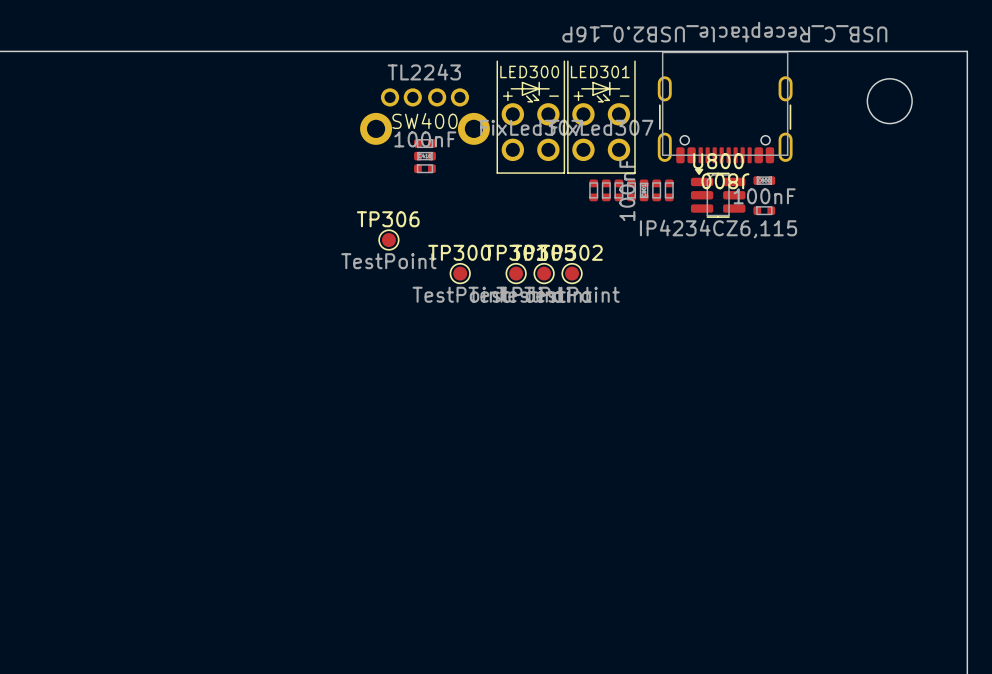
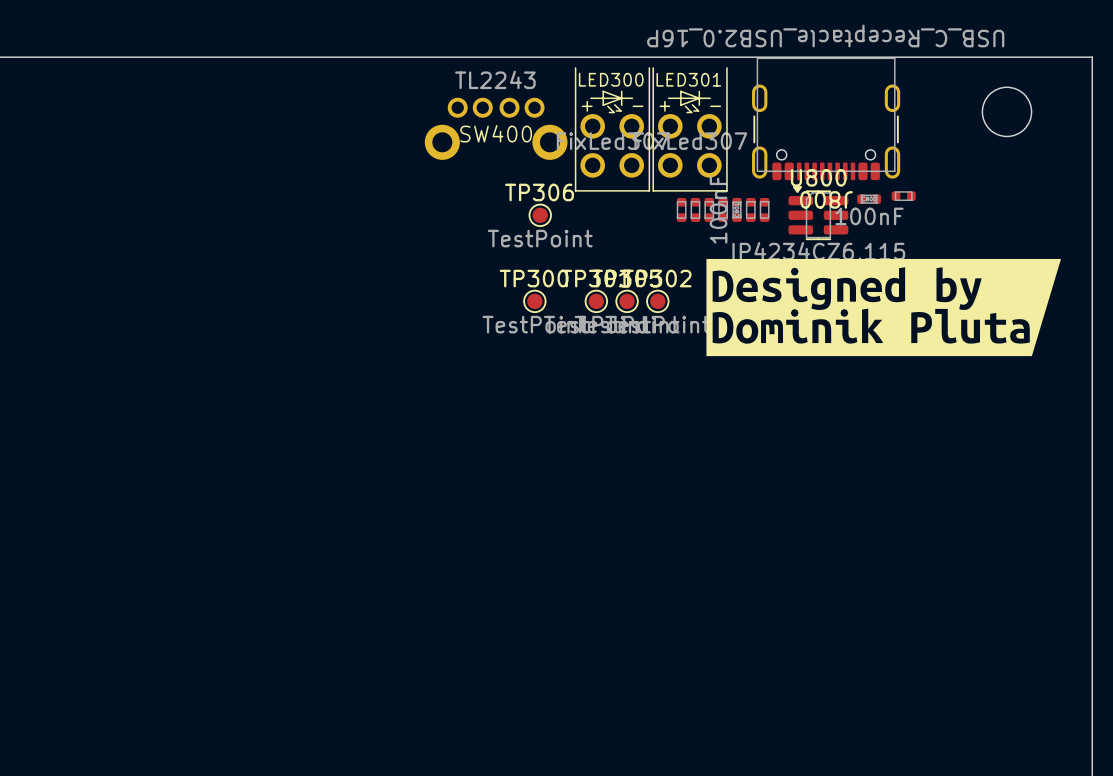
part: (424, 143) -> none
part: 100nF (424, 156) -> none
part: (424, 168) -> none
part position: (764, 210) -> (903, 196)
drawing: none -> [706, 258, 1062, 357]
TP306 position: (388, 240) -> (540, 215)

